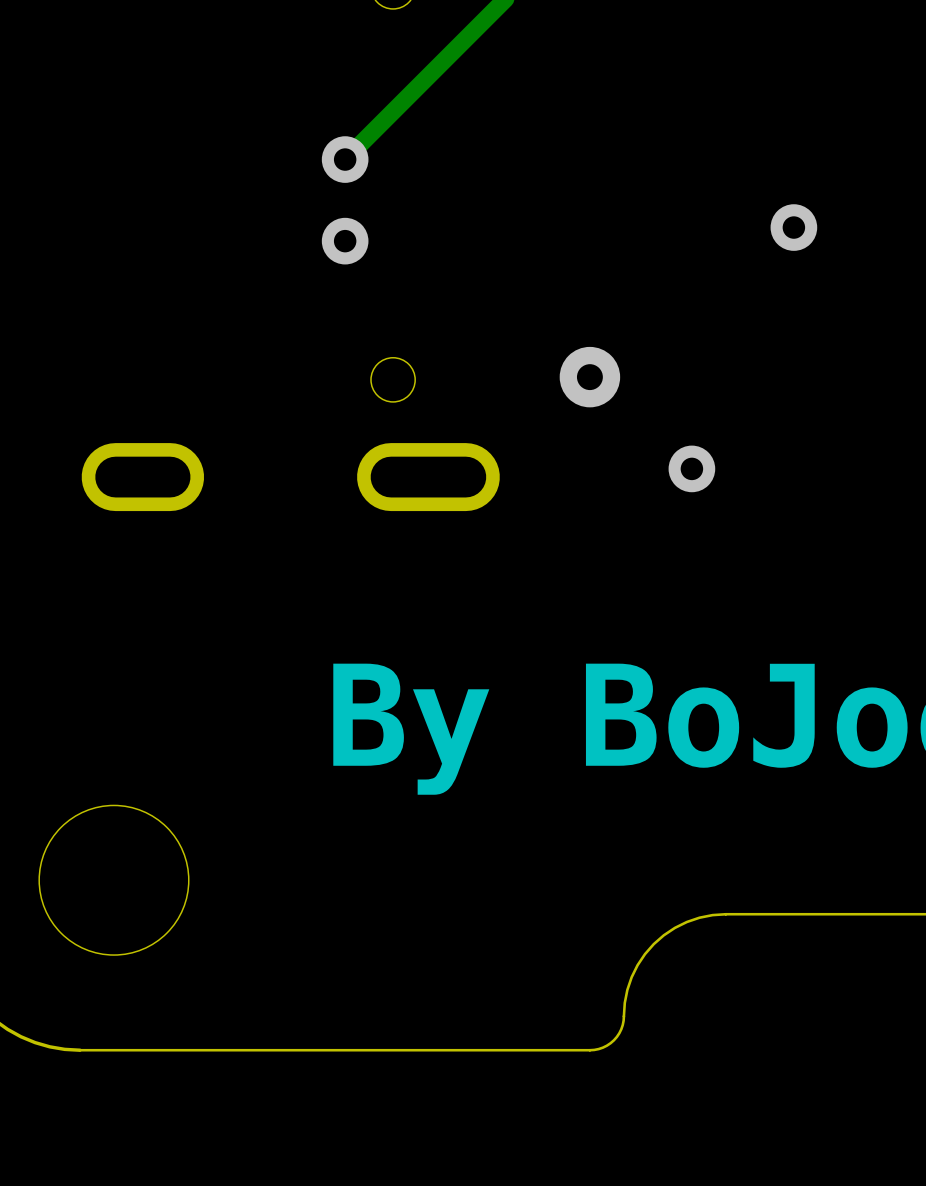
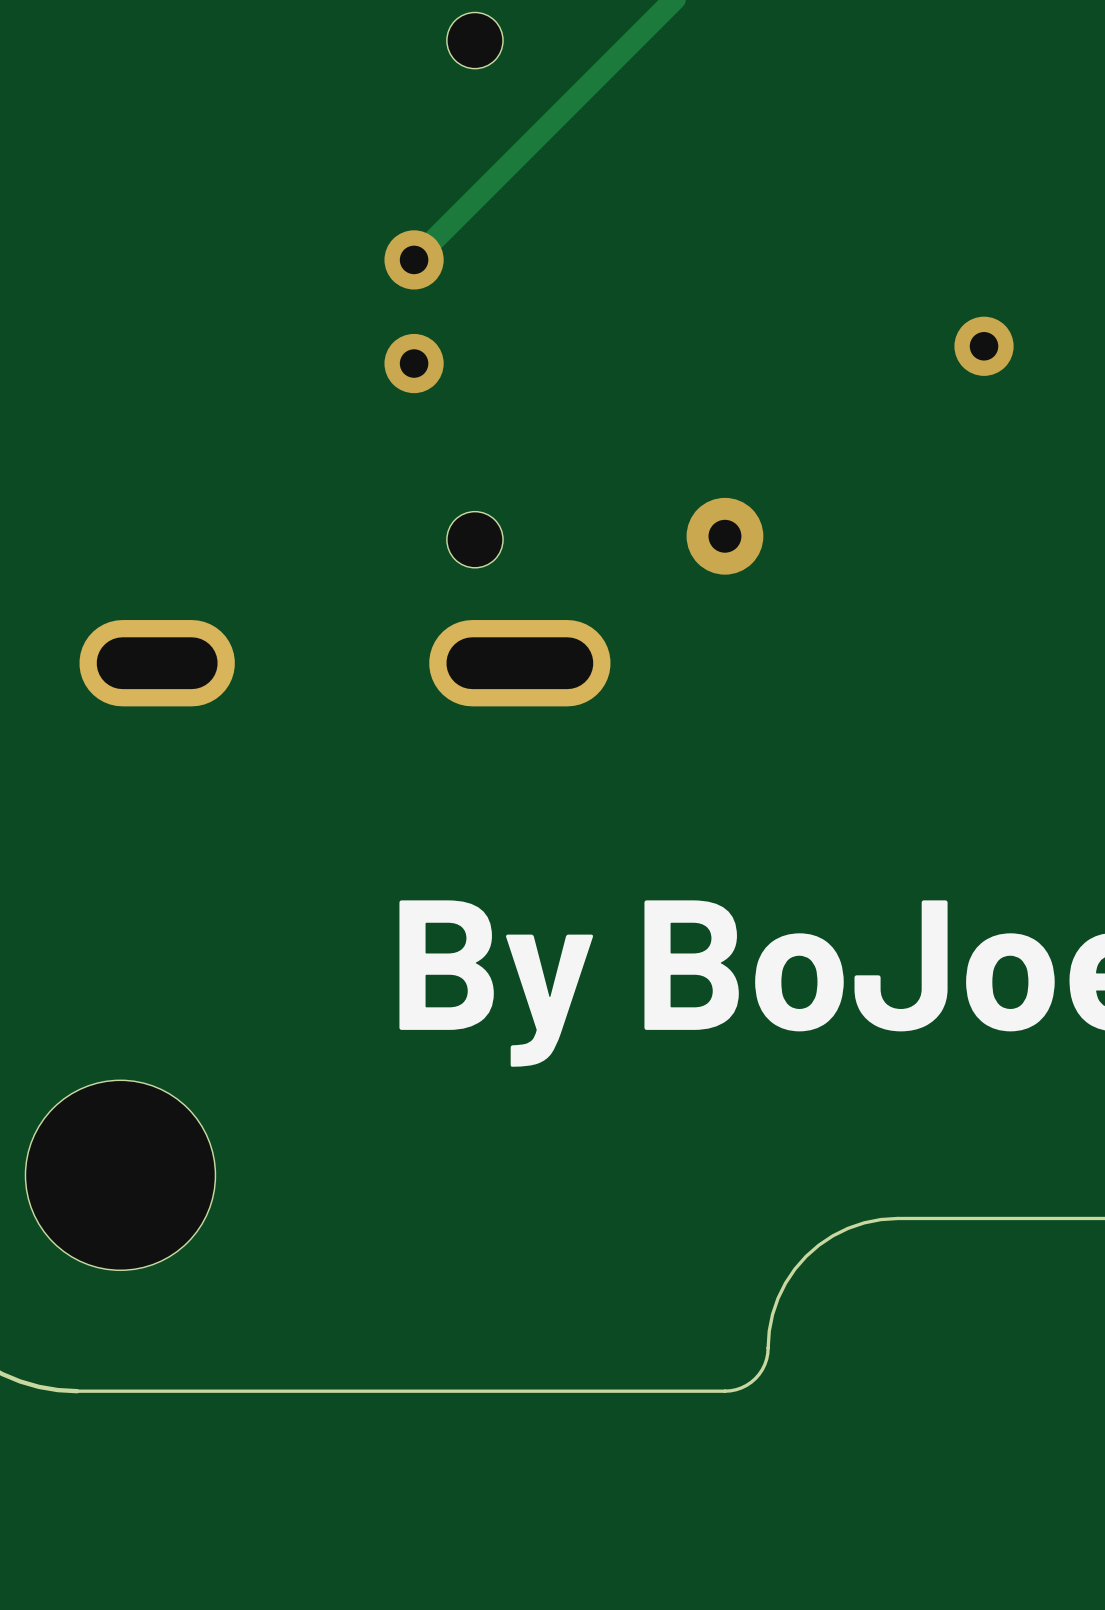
via: (691, 468) -> none

